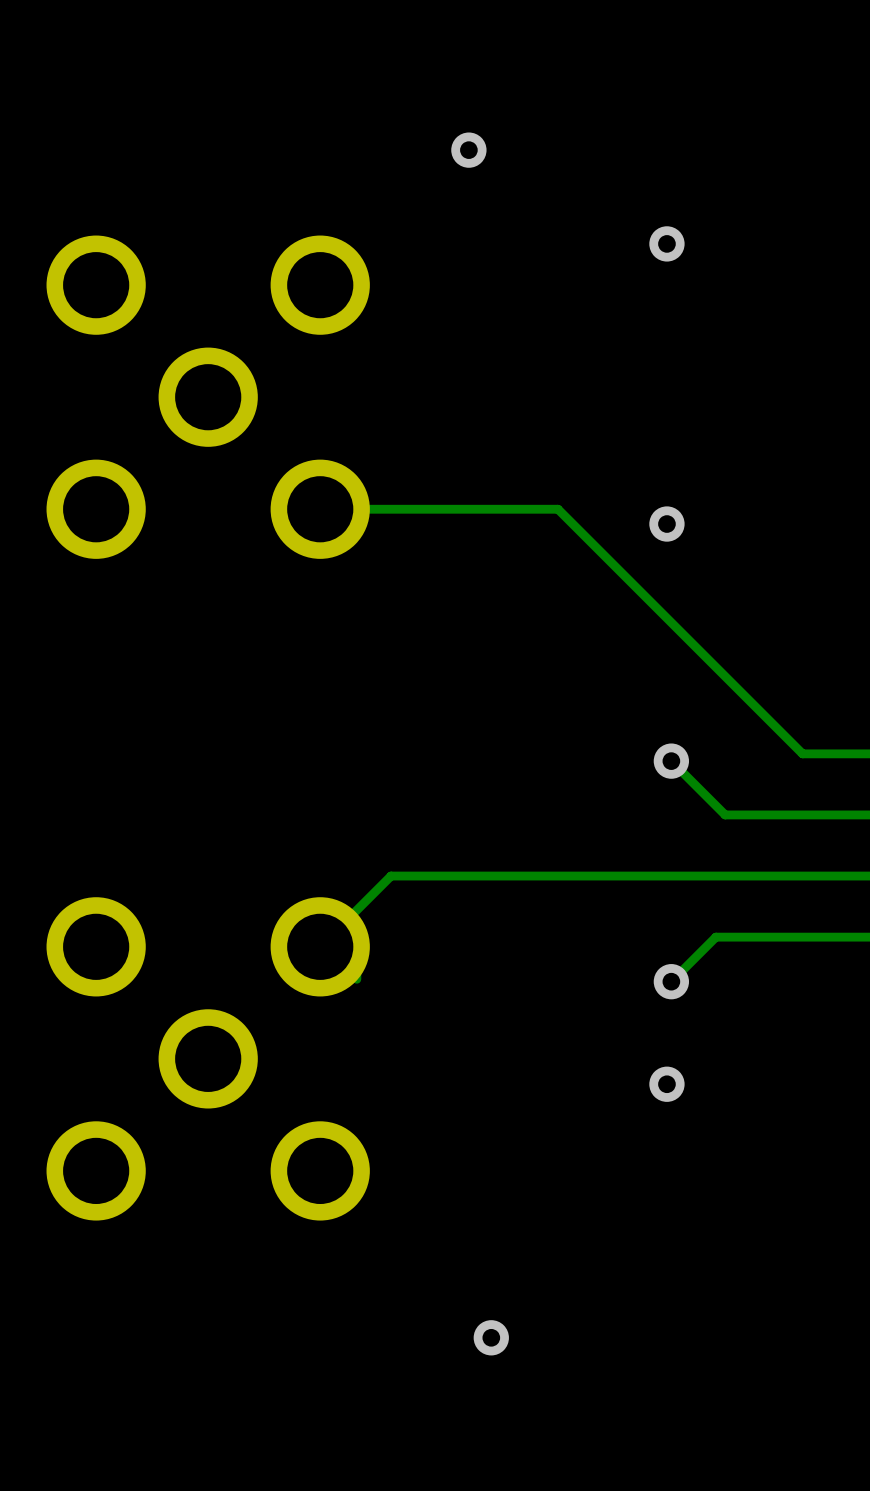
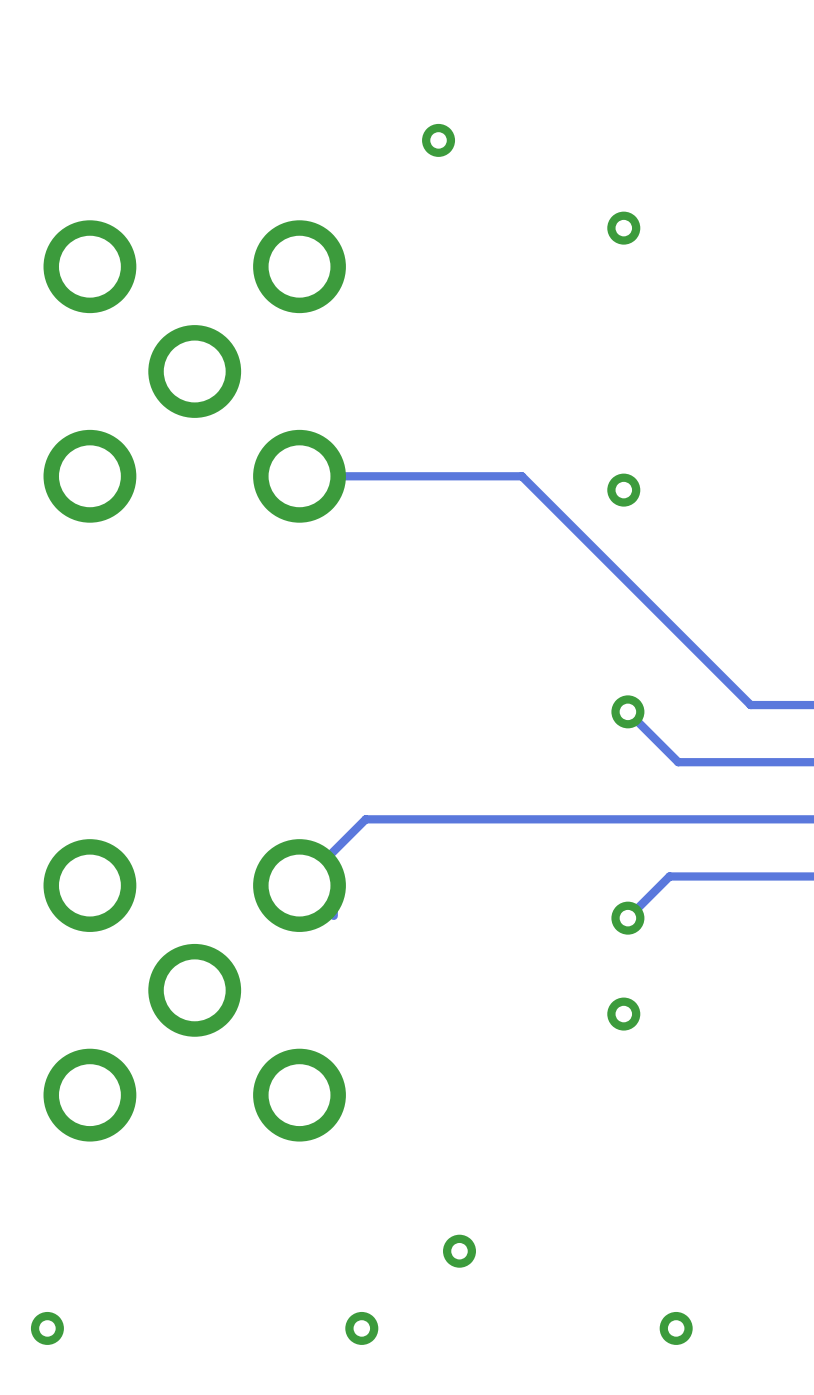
via: none -> (47, 1328)
via: none -> (361, 1328)
via: none -> (676, 1328)

